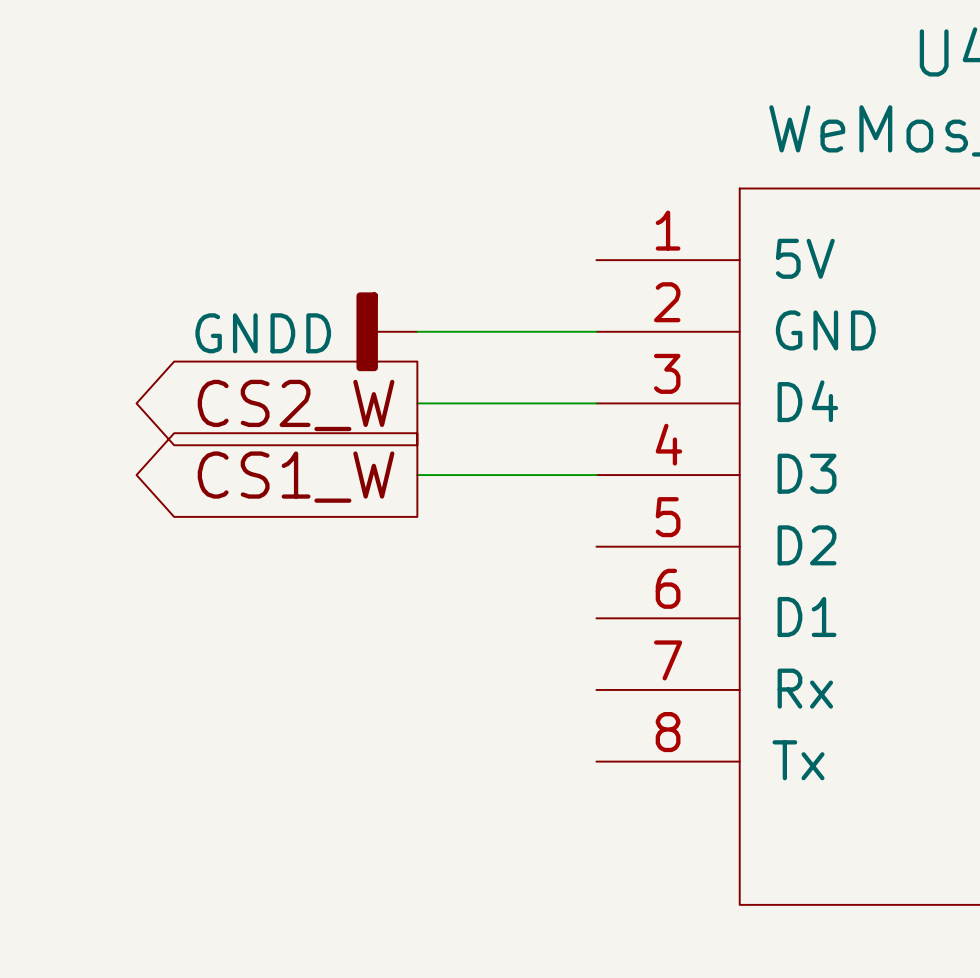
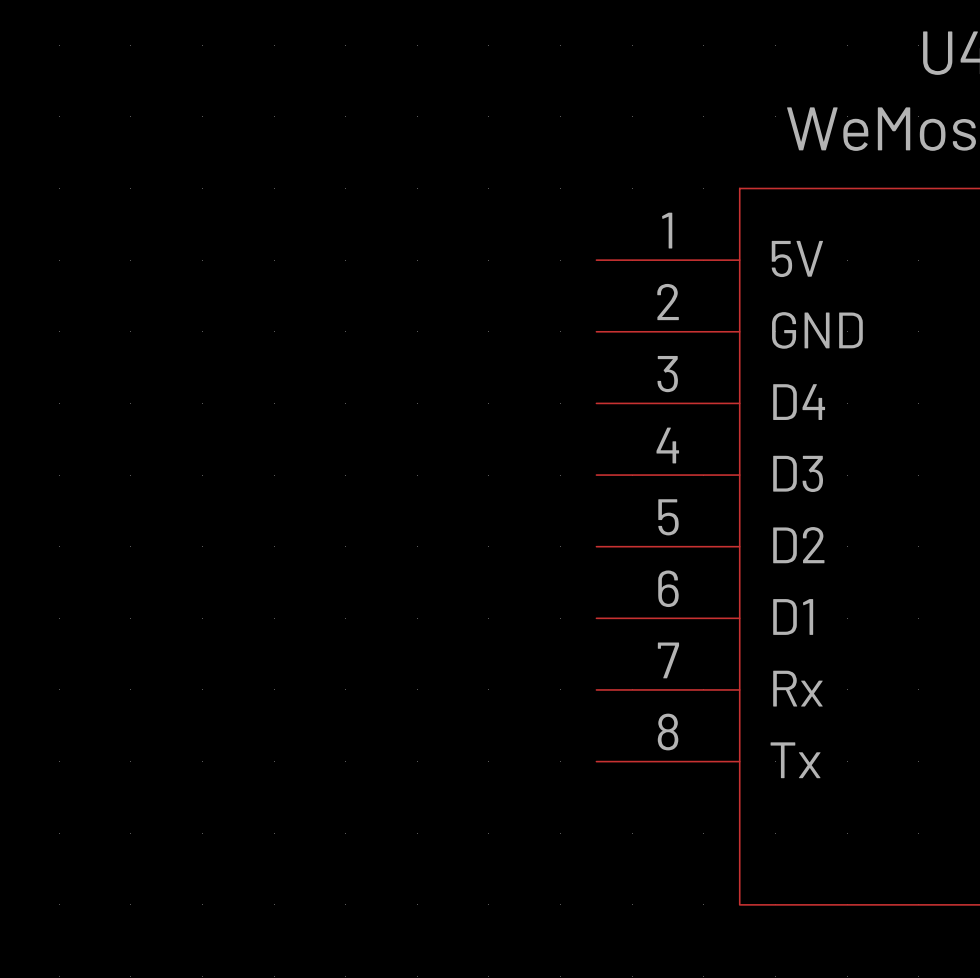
power symbol: GNDD (386, 331) -> none
wire: (417, 331) (596, 331) -> none
wire: (417, 403) (596, 403) -> none
global label: CS2_W (296, 405) -> none
wire: (417, 475) (596, 475) -> none
global label: CS1_W (296, 477) -> none

